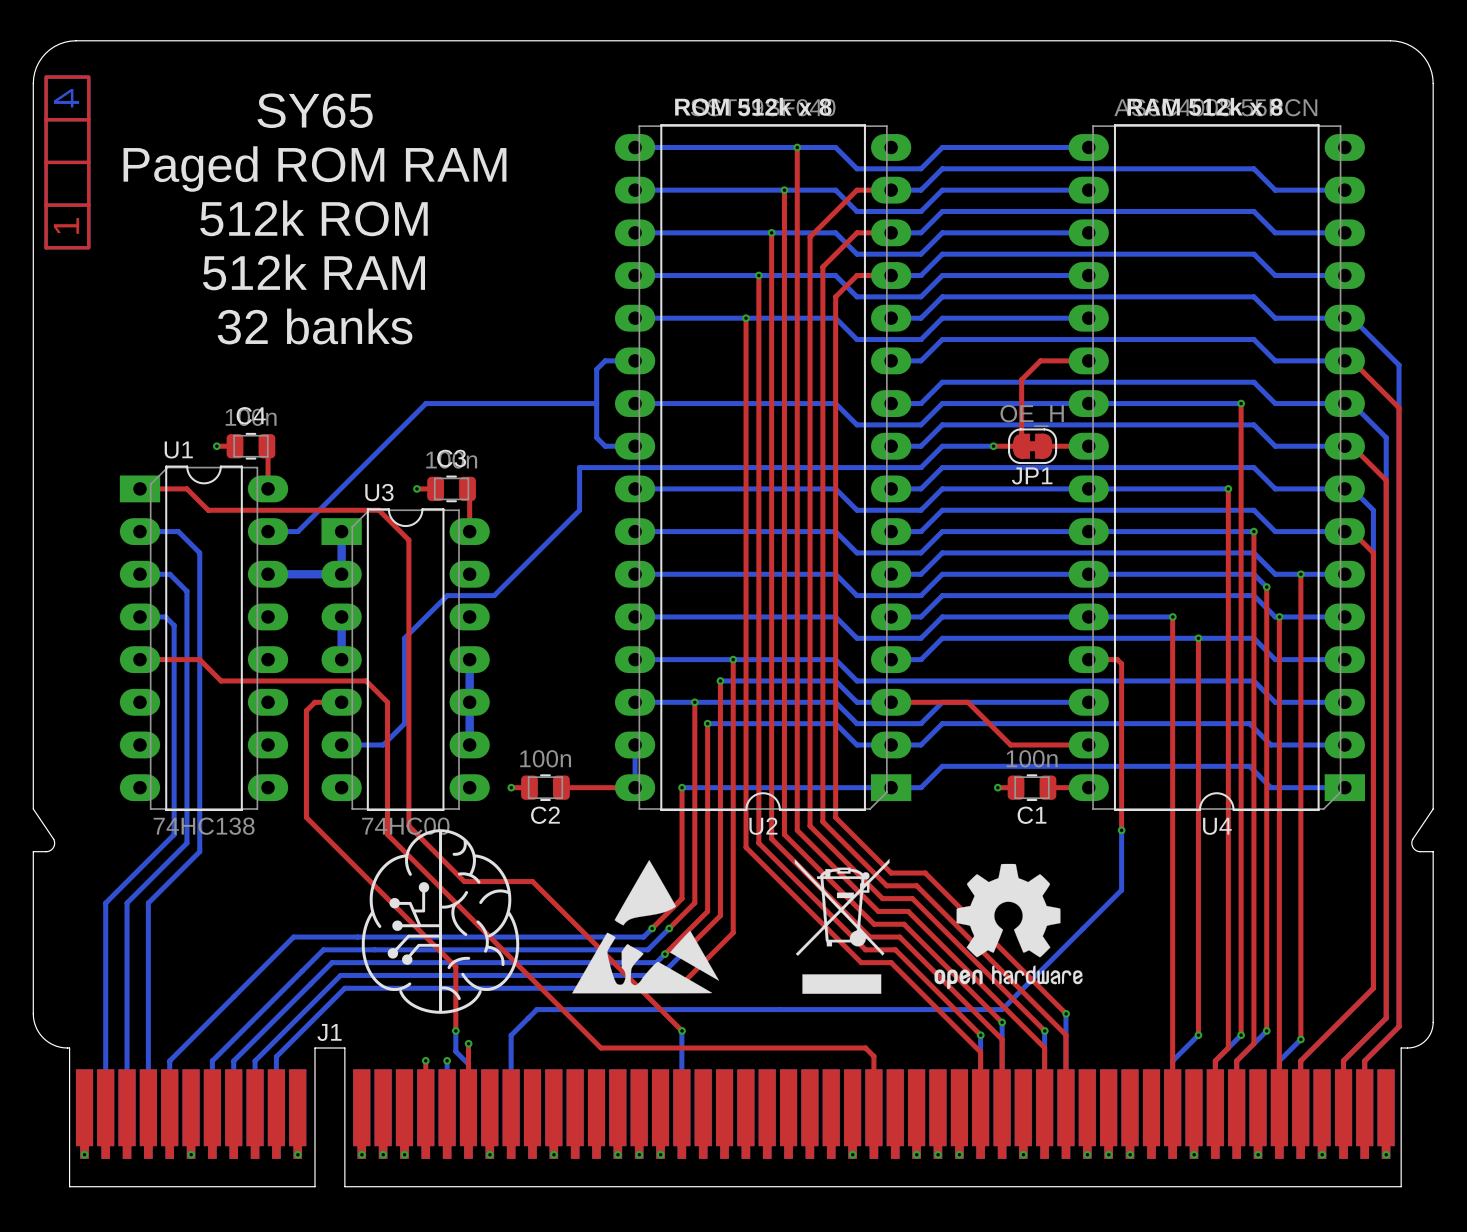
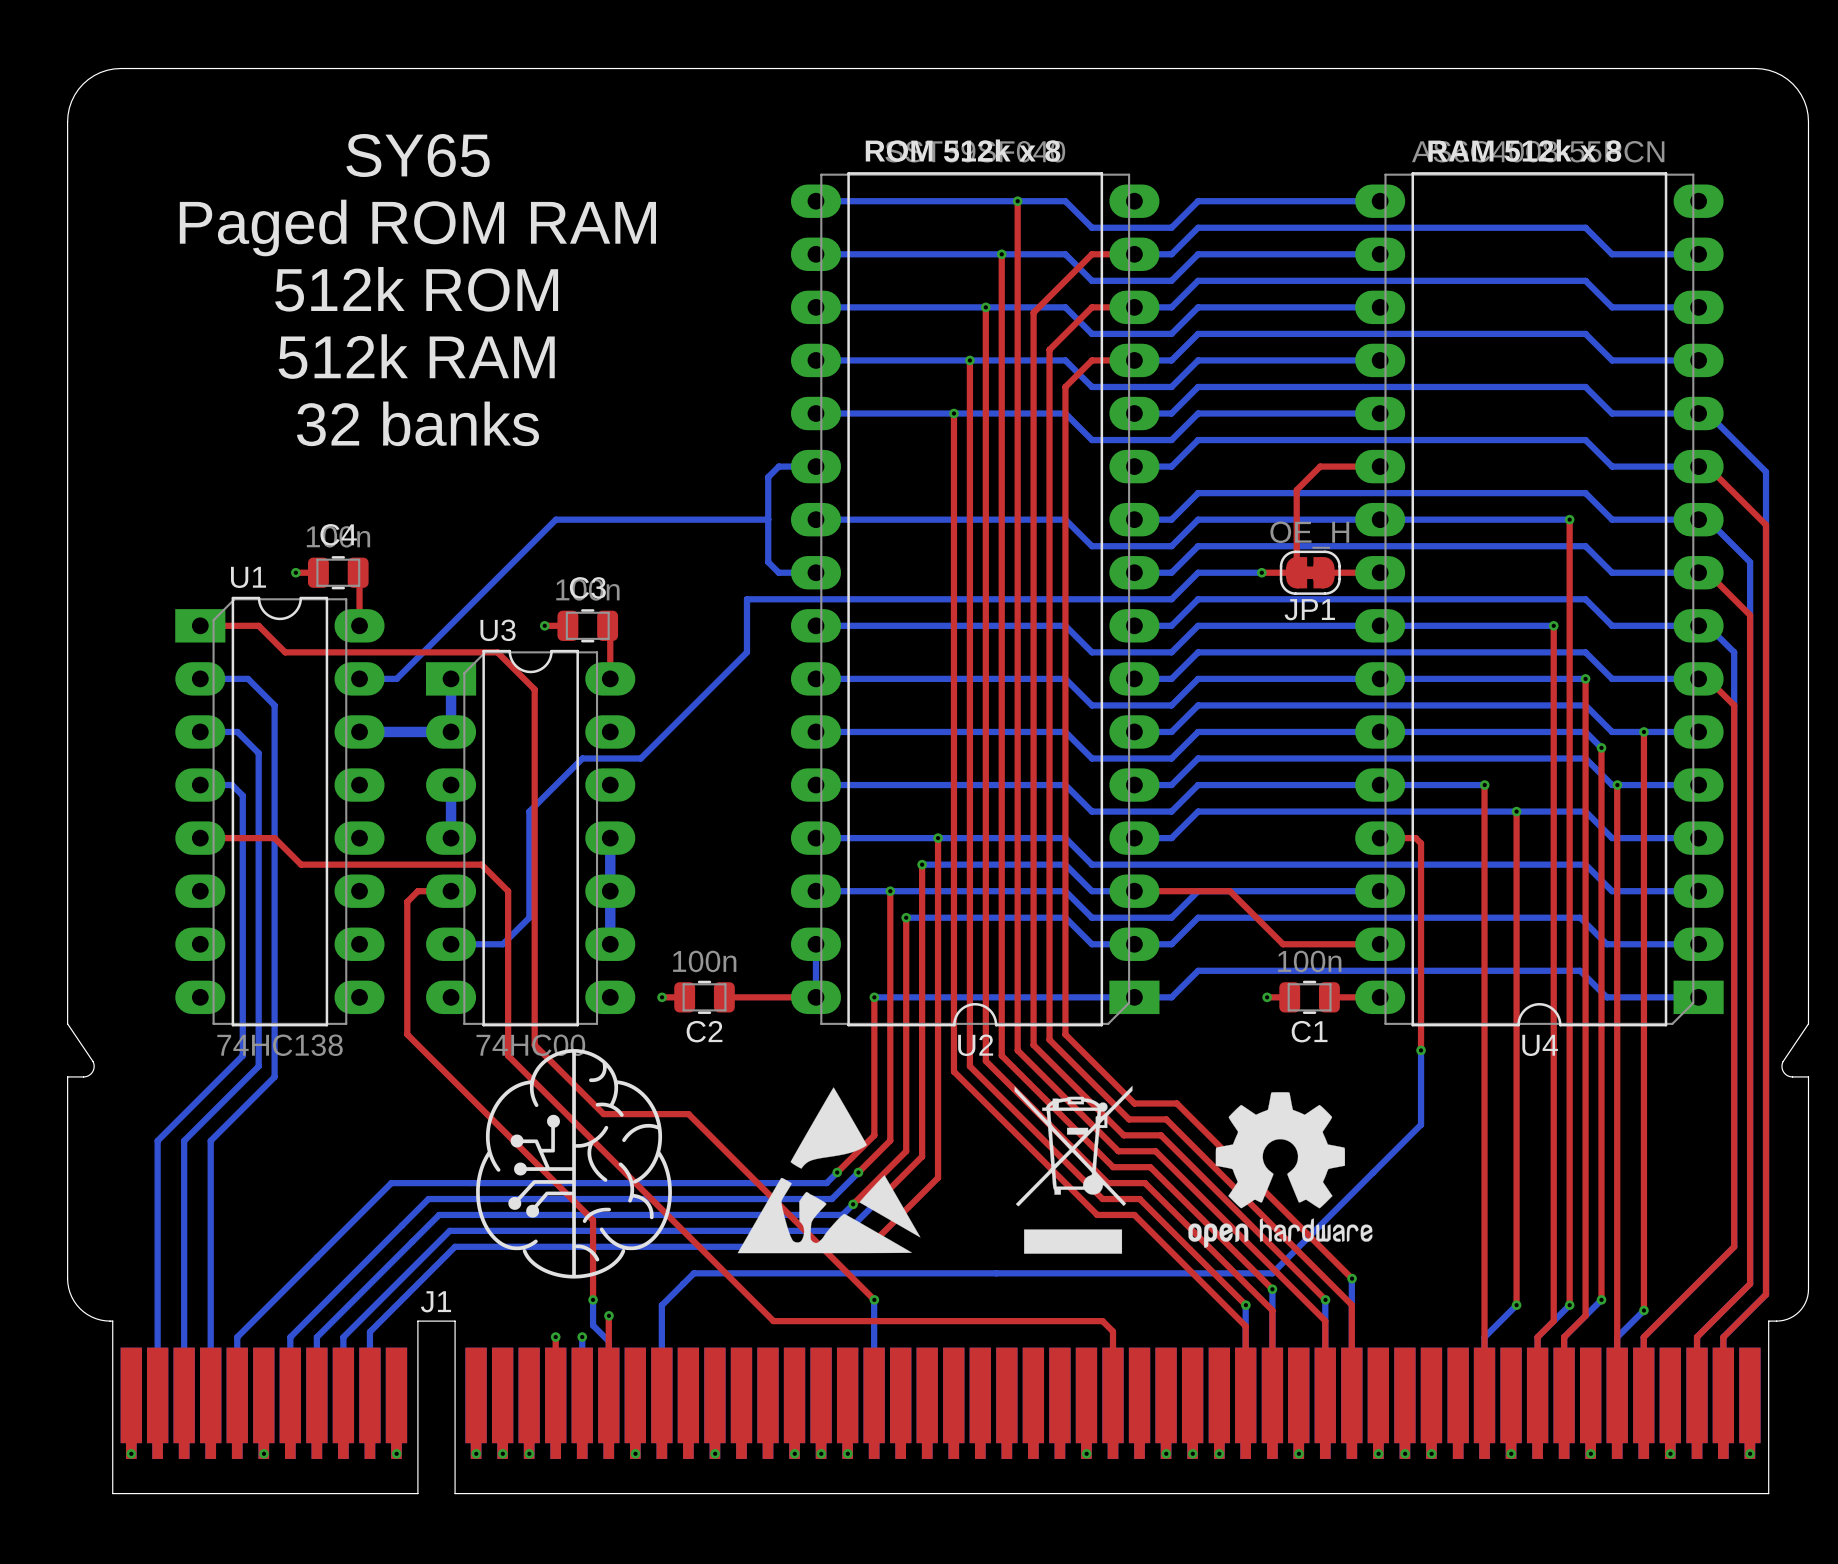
drawing: [44, 75, 91, 250] -> none

